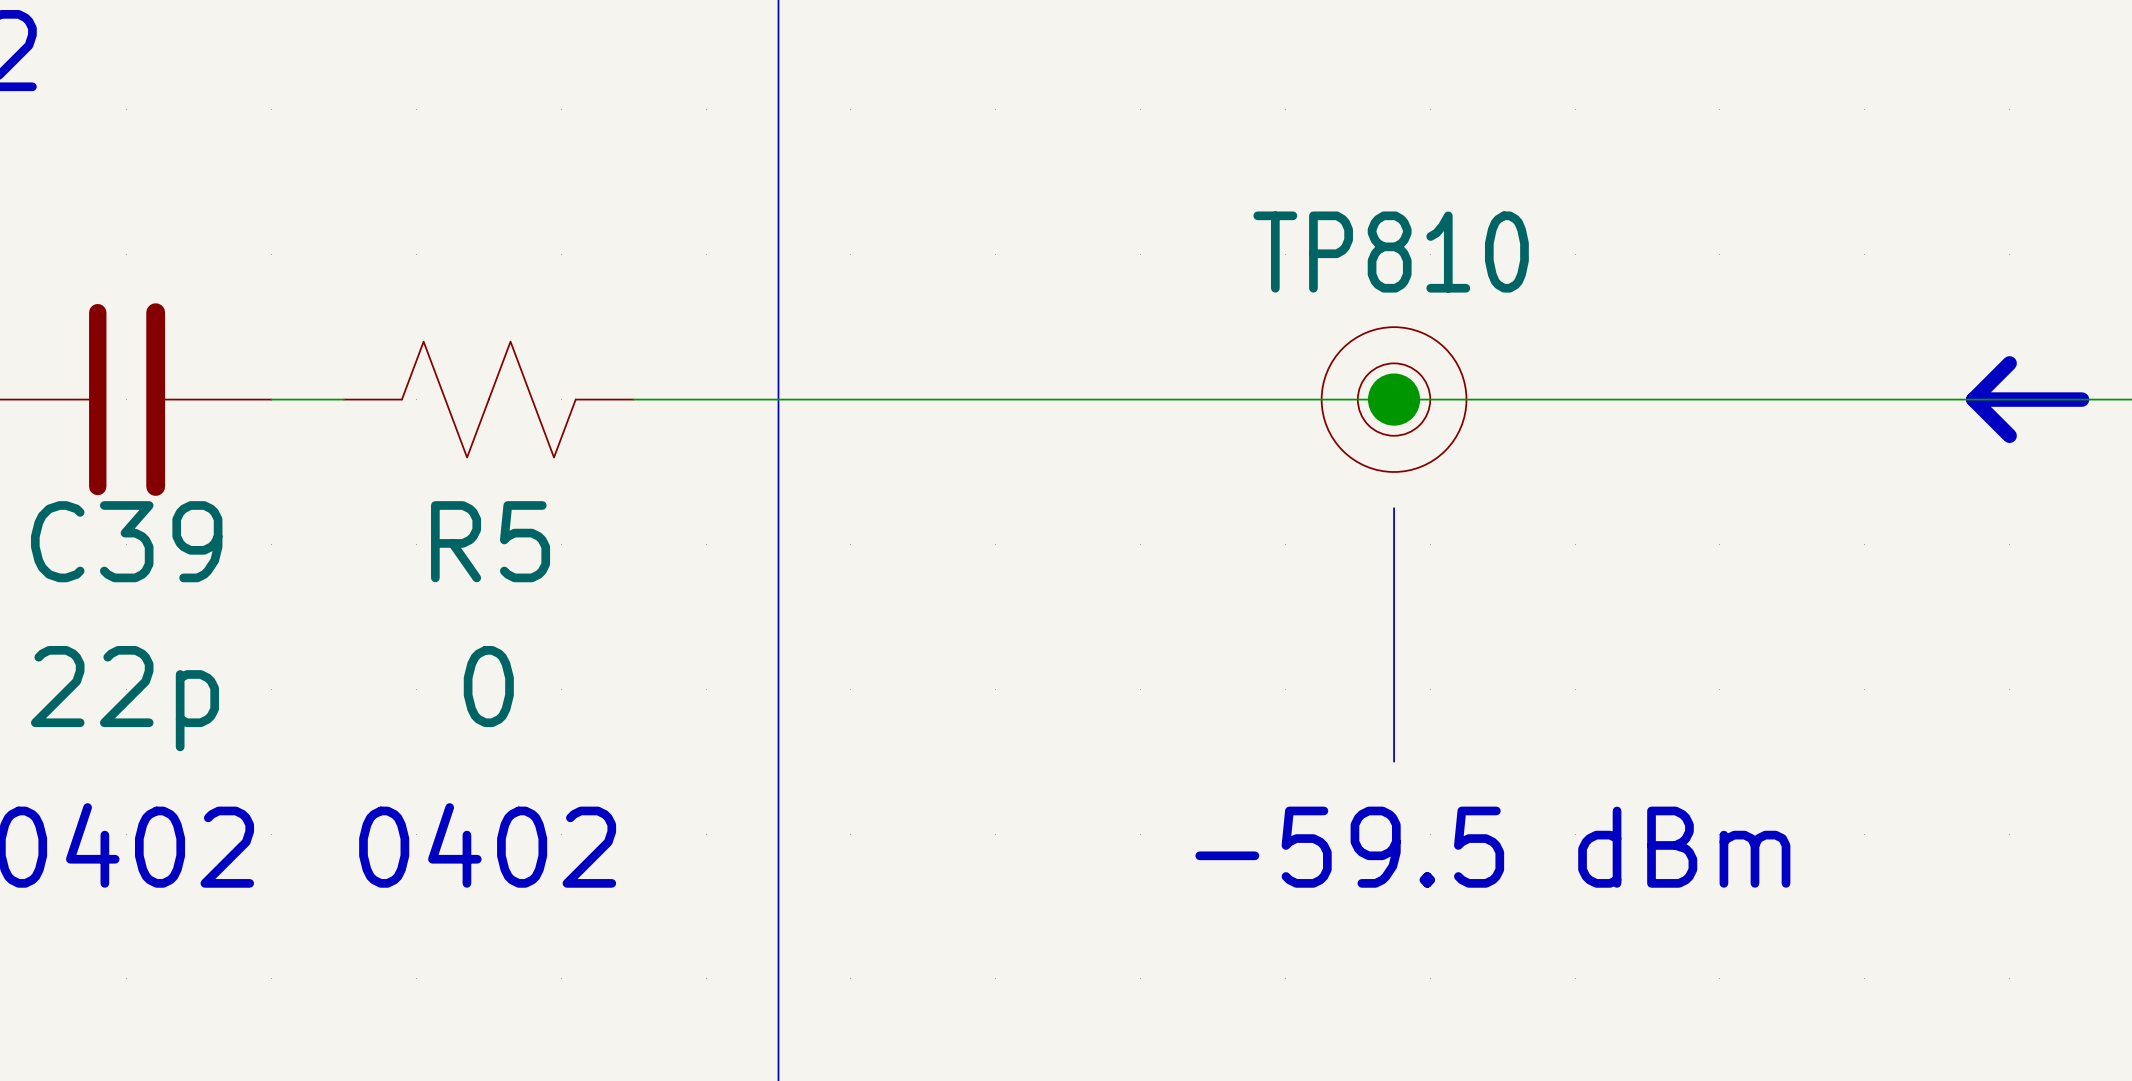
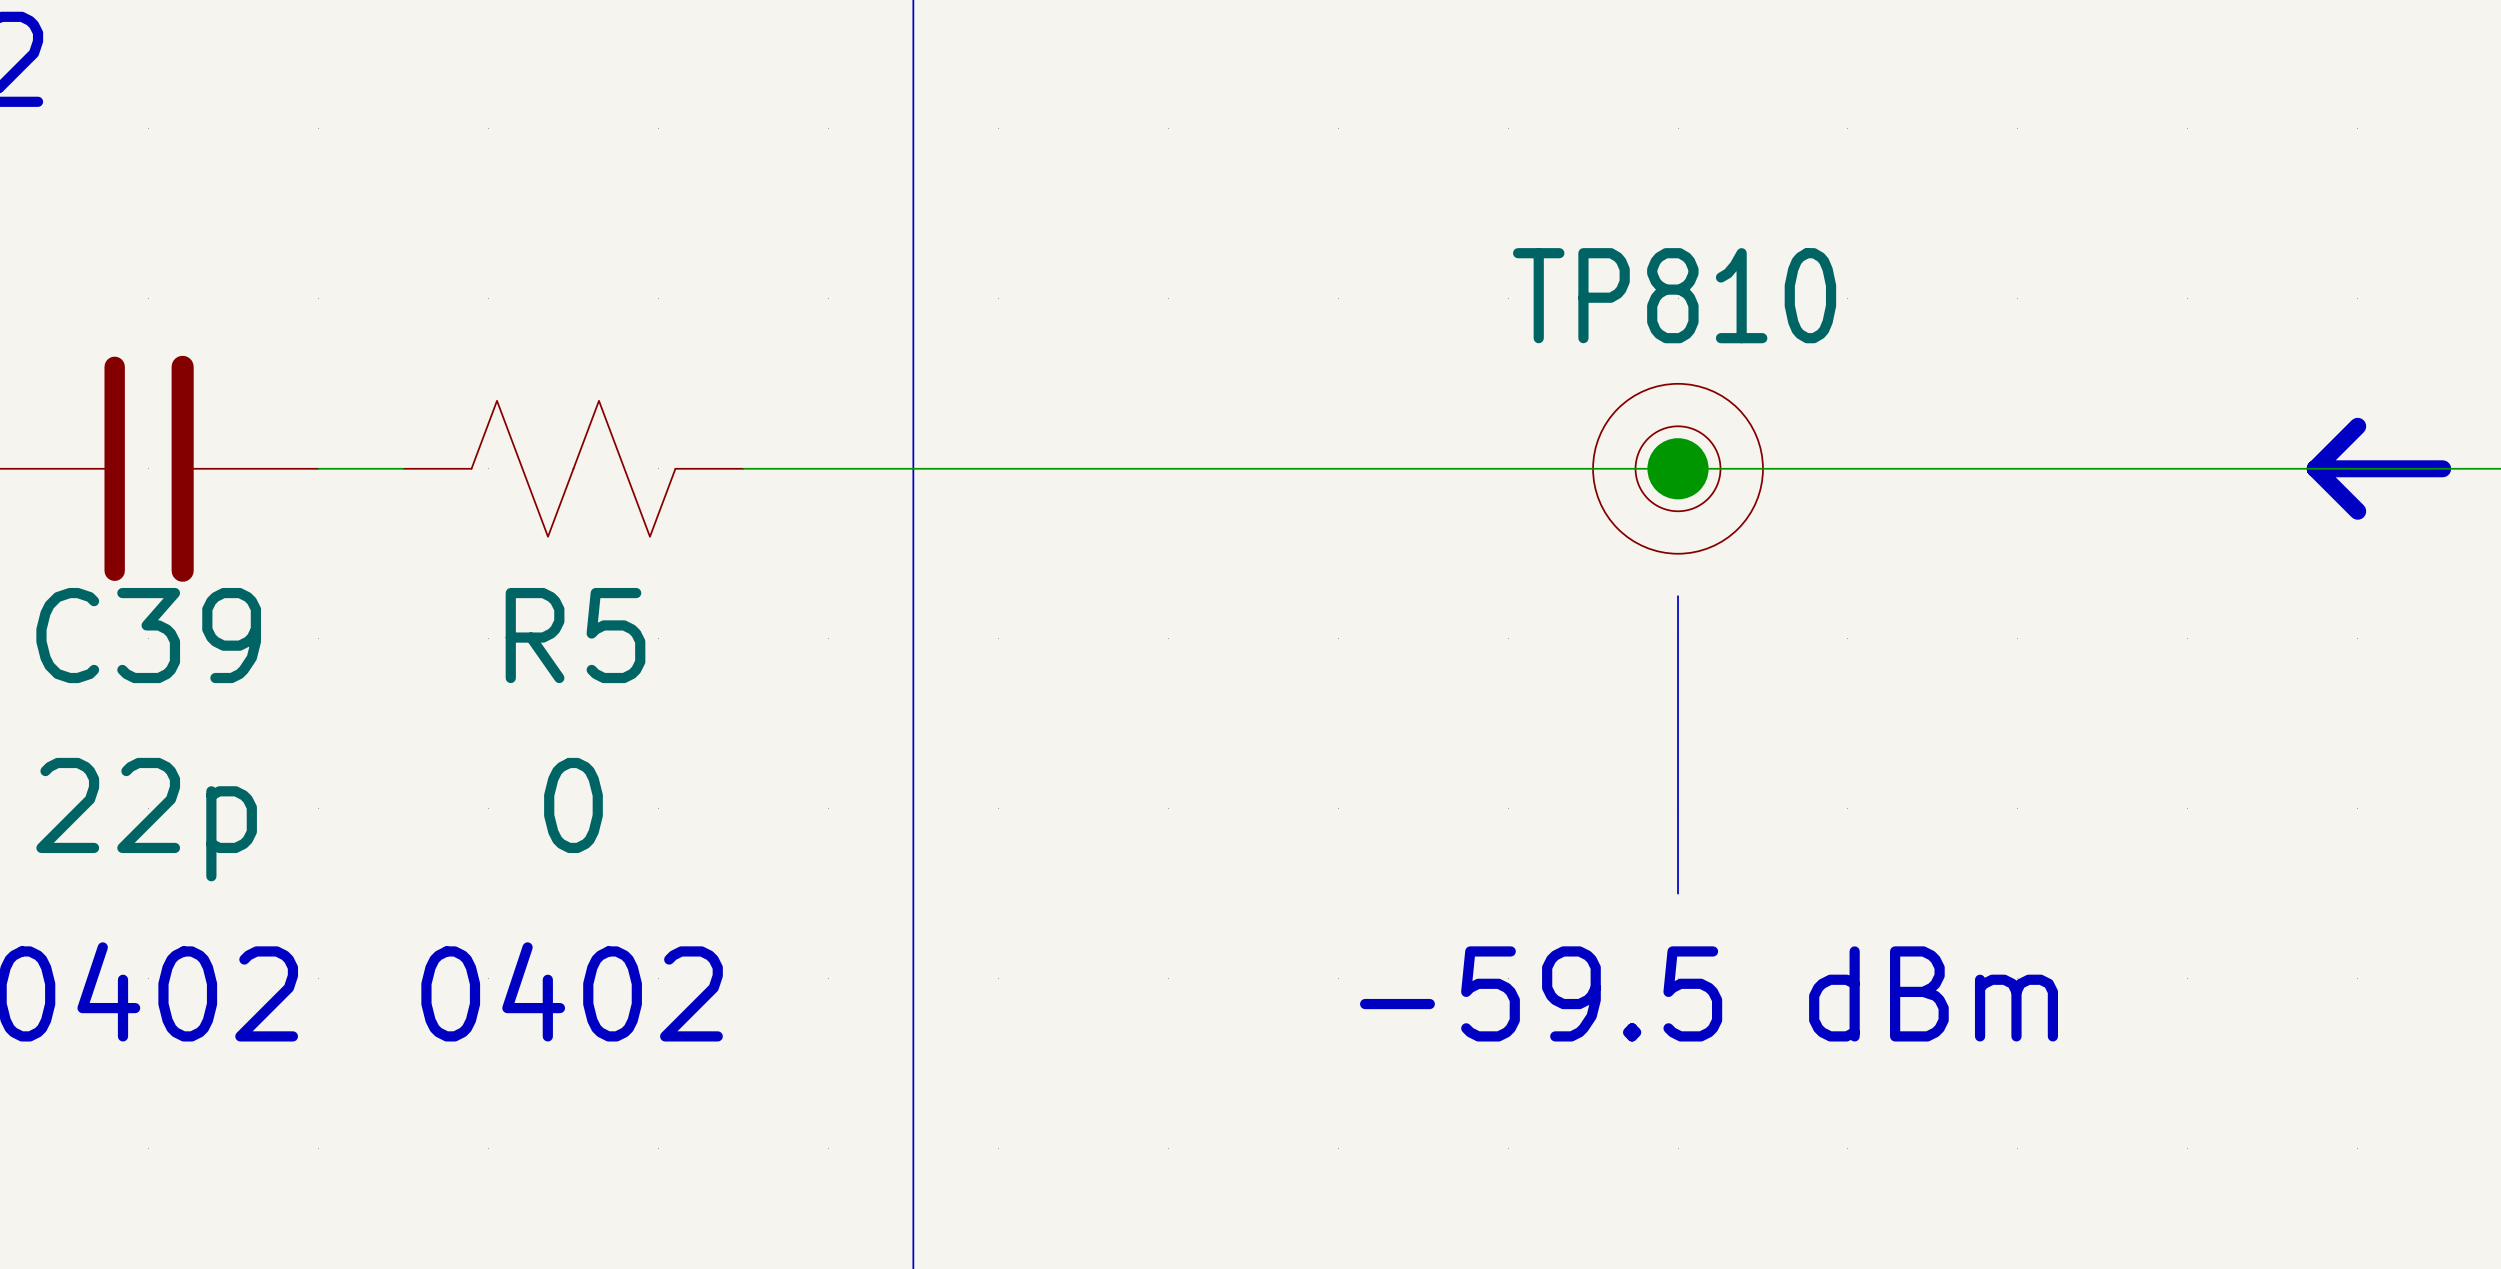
junction position: (1394, 399) -> (1678, 468)
TP810 position: (1394, 399) -> (1678, 468)
line: (1394, 508) (1394, 761) -> (1678, 596) (1678, 893)
text position: -59.5 dBm (1492, 847) -> -59.5 dBm (1708, 993)

